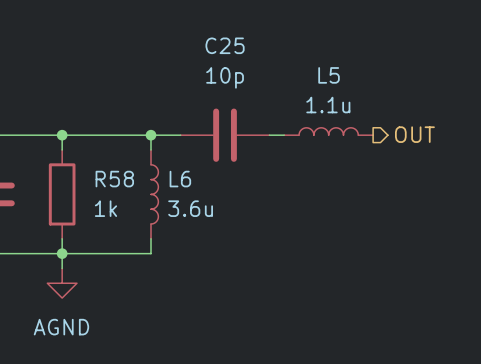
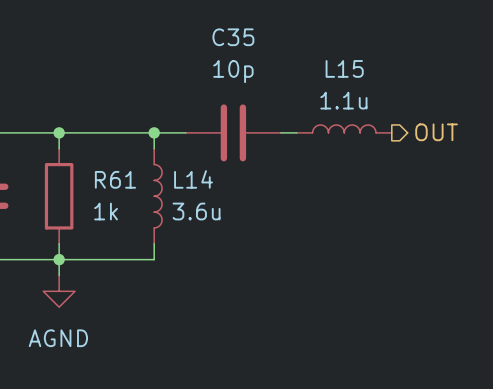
C25 name: C25 (225, 45) -> C35 (233, 37)
L5 name: L5 (329, 75) -> L15 (344, 68)
R58 name: R58 (114, 179) -> R61 (115, 179)
L6 name: L6 (180, 179) -> L14 (193, 179)

